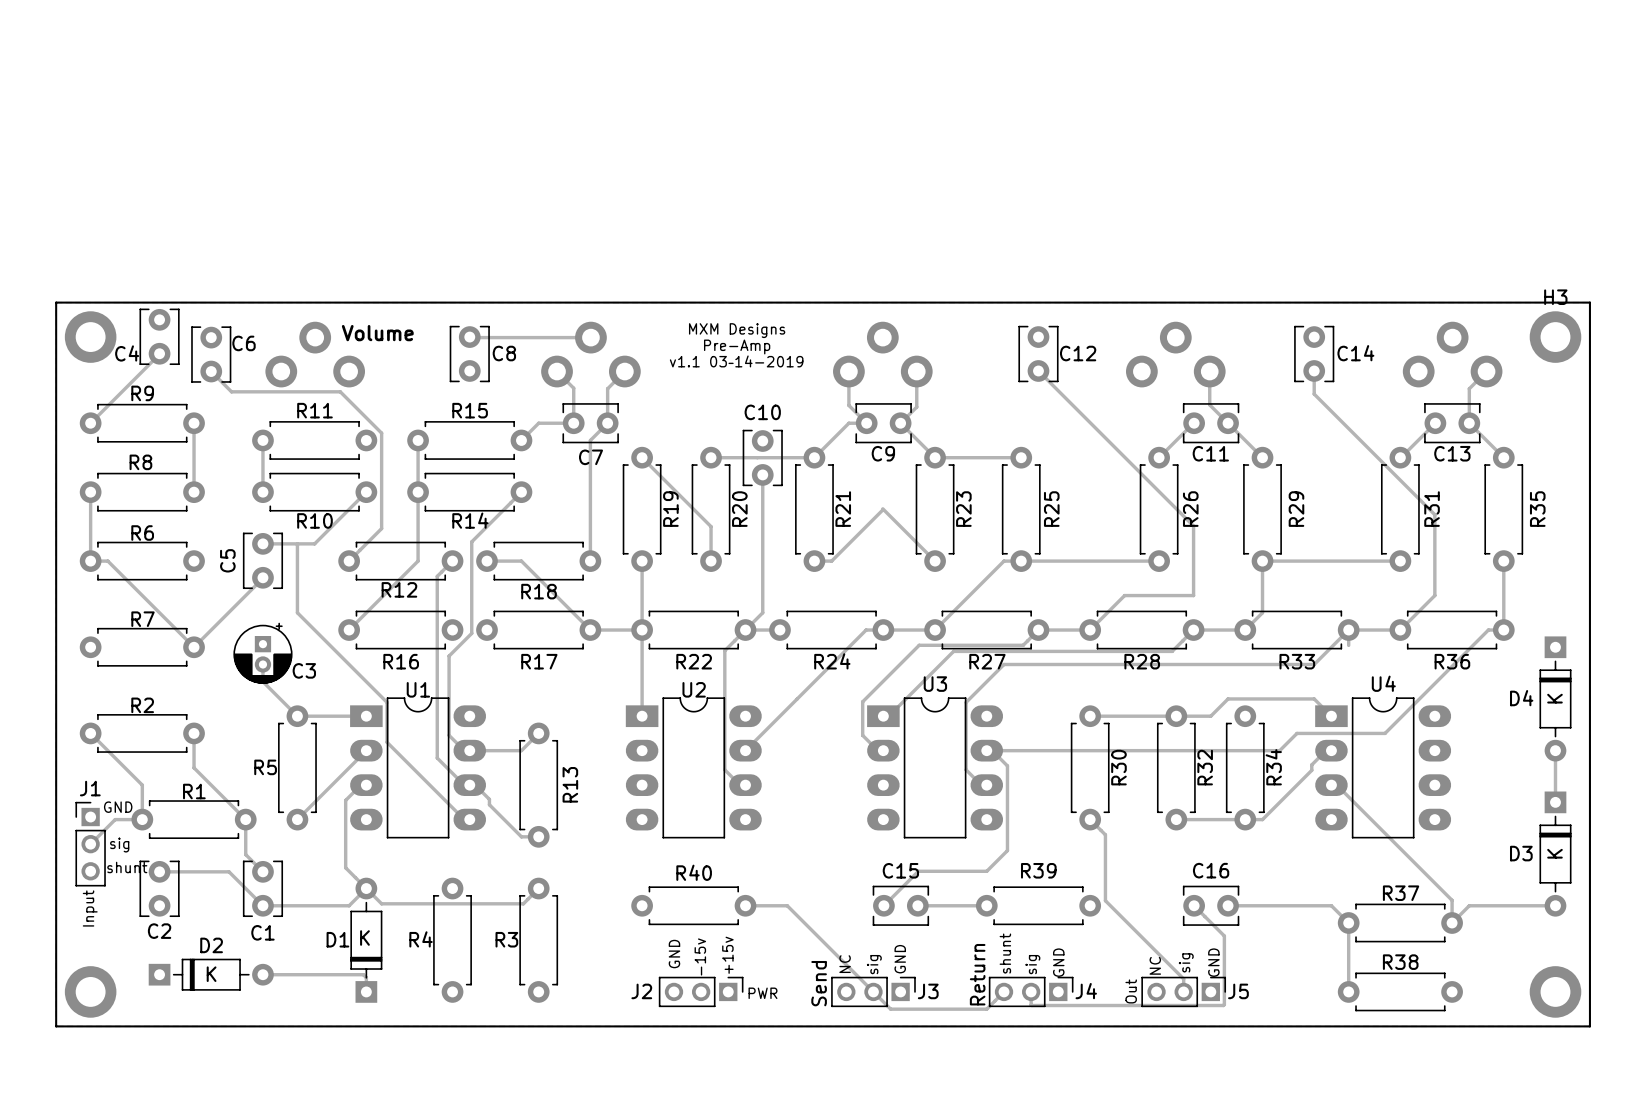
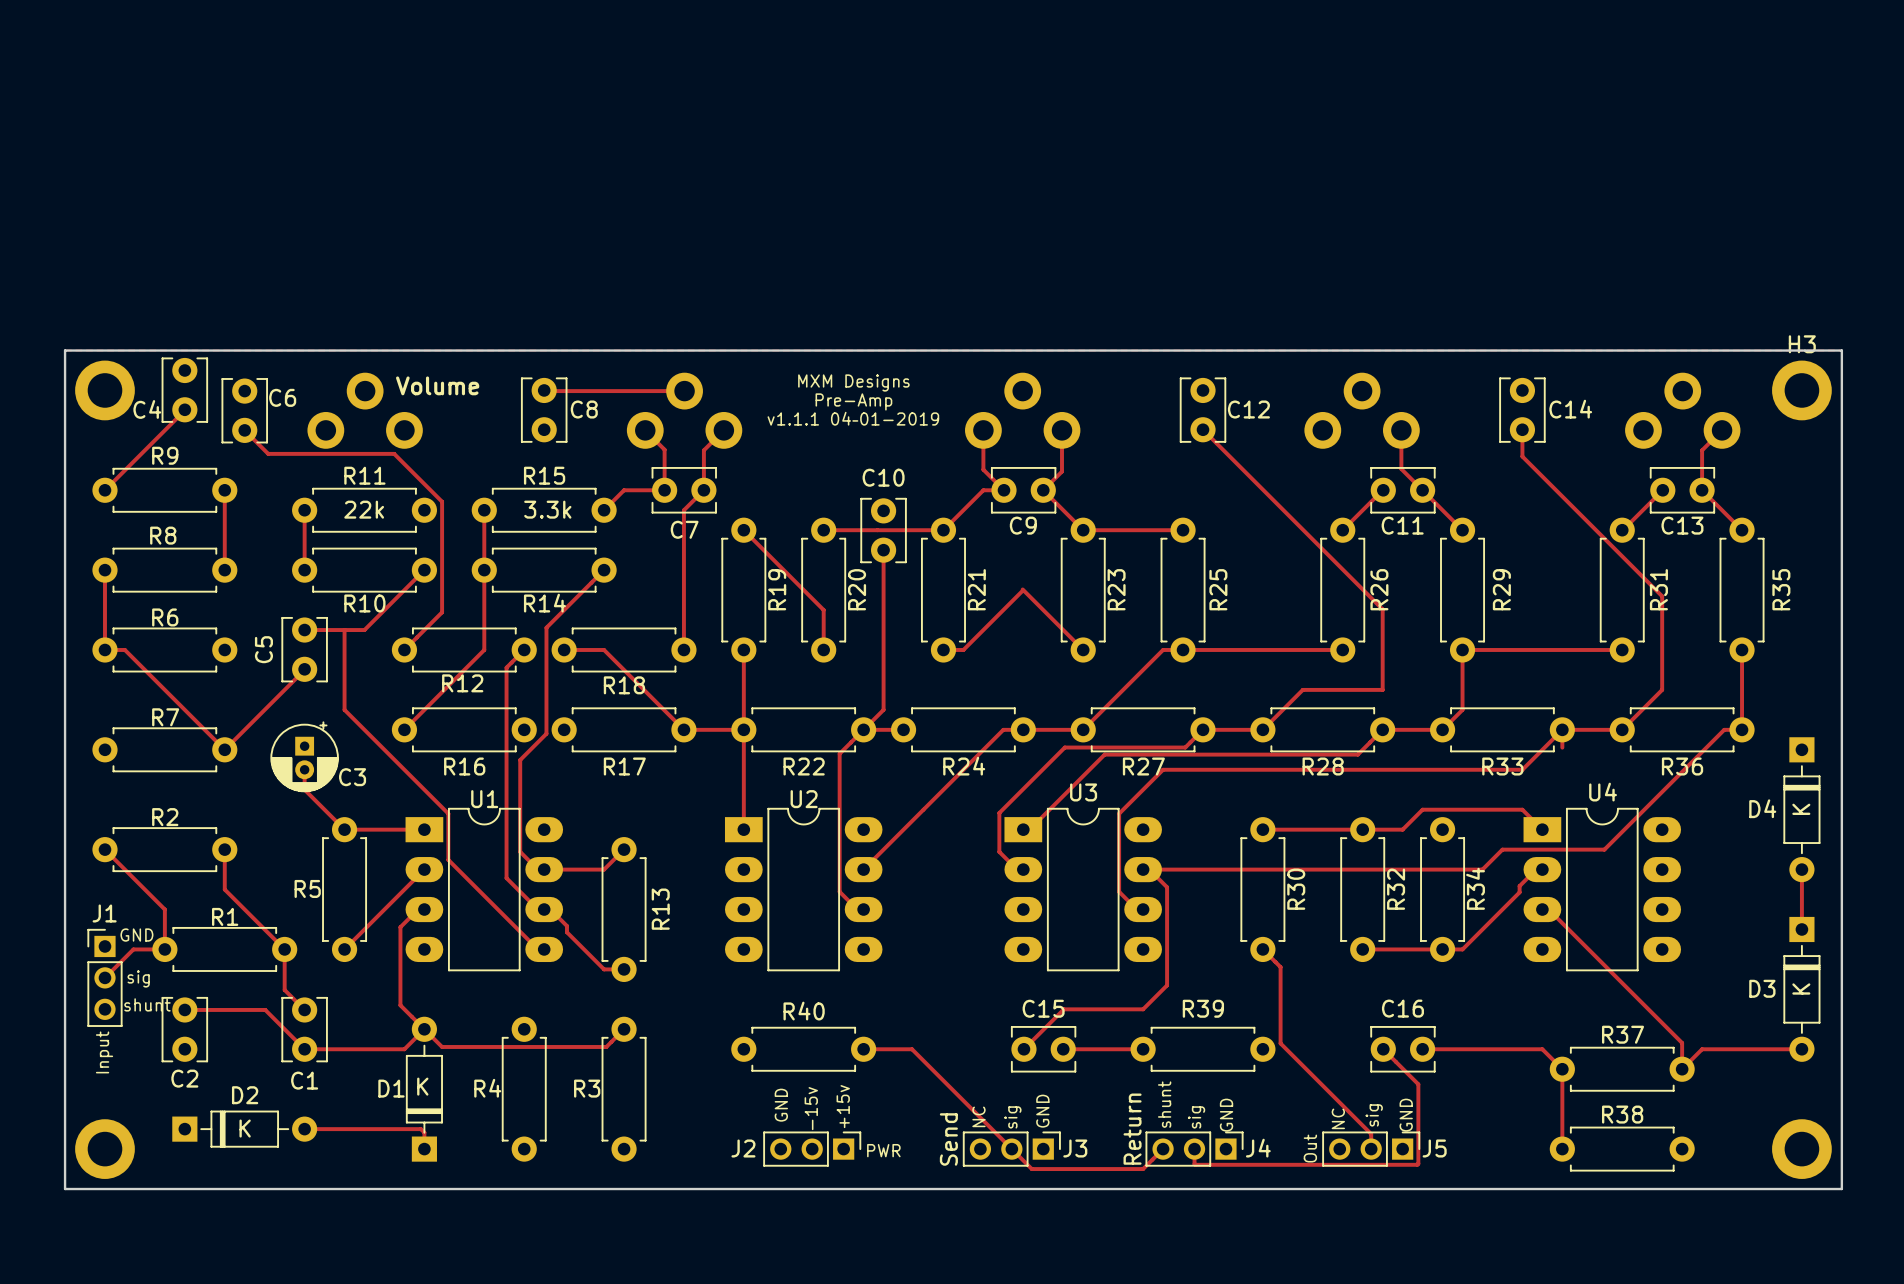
text: v1.1 03–14-2019 (736, 361) -> v1.1.1 04–01-2019 (853, 418)
R11 value: none -> 22k (364, 509)
R15 value: none -> 3.3k (547, 509)

